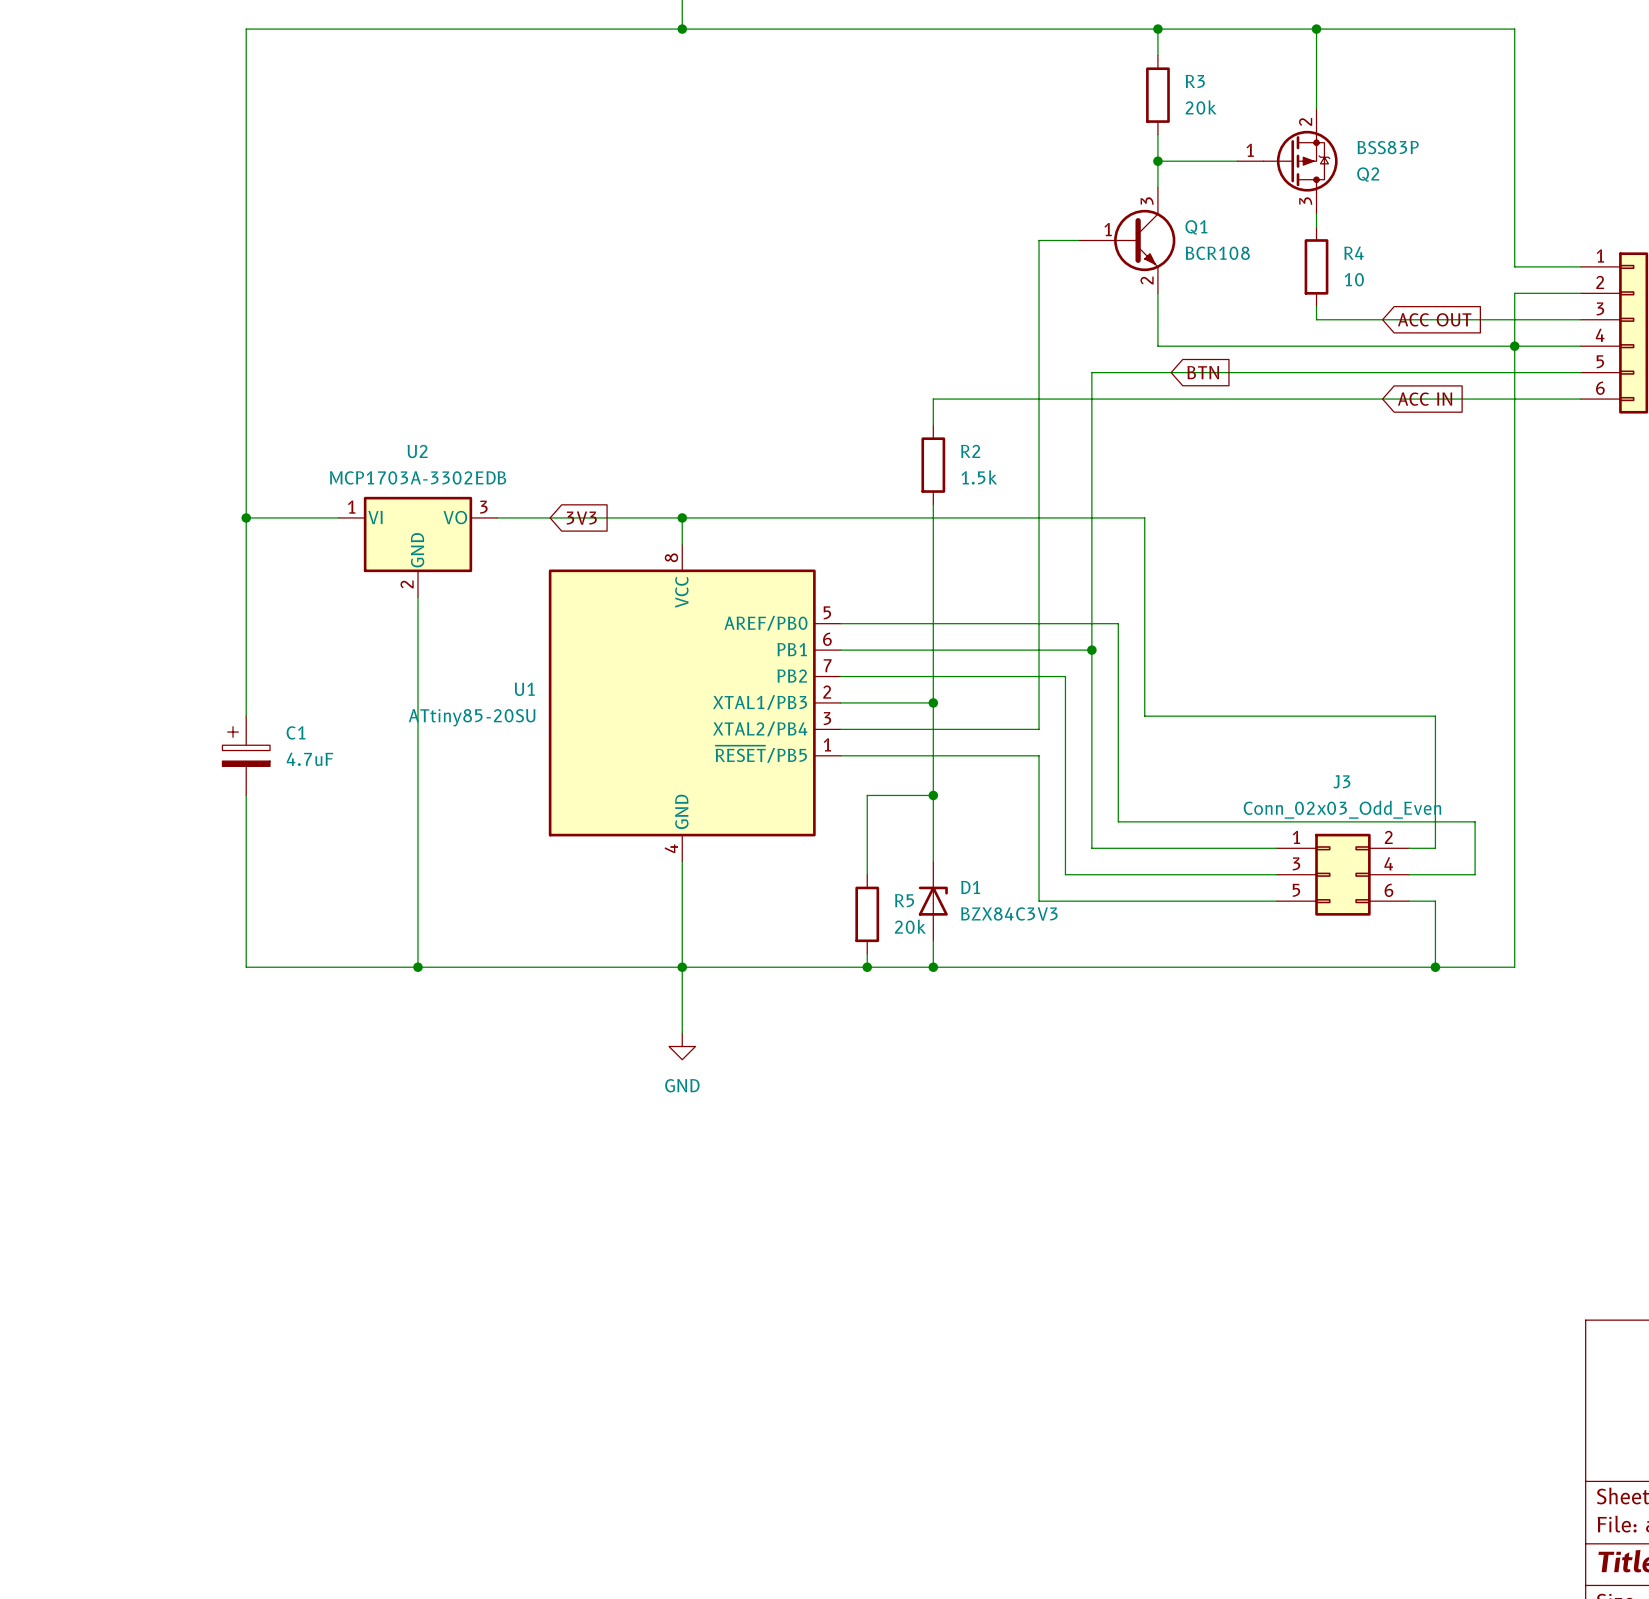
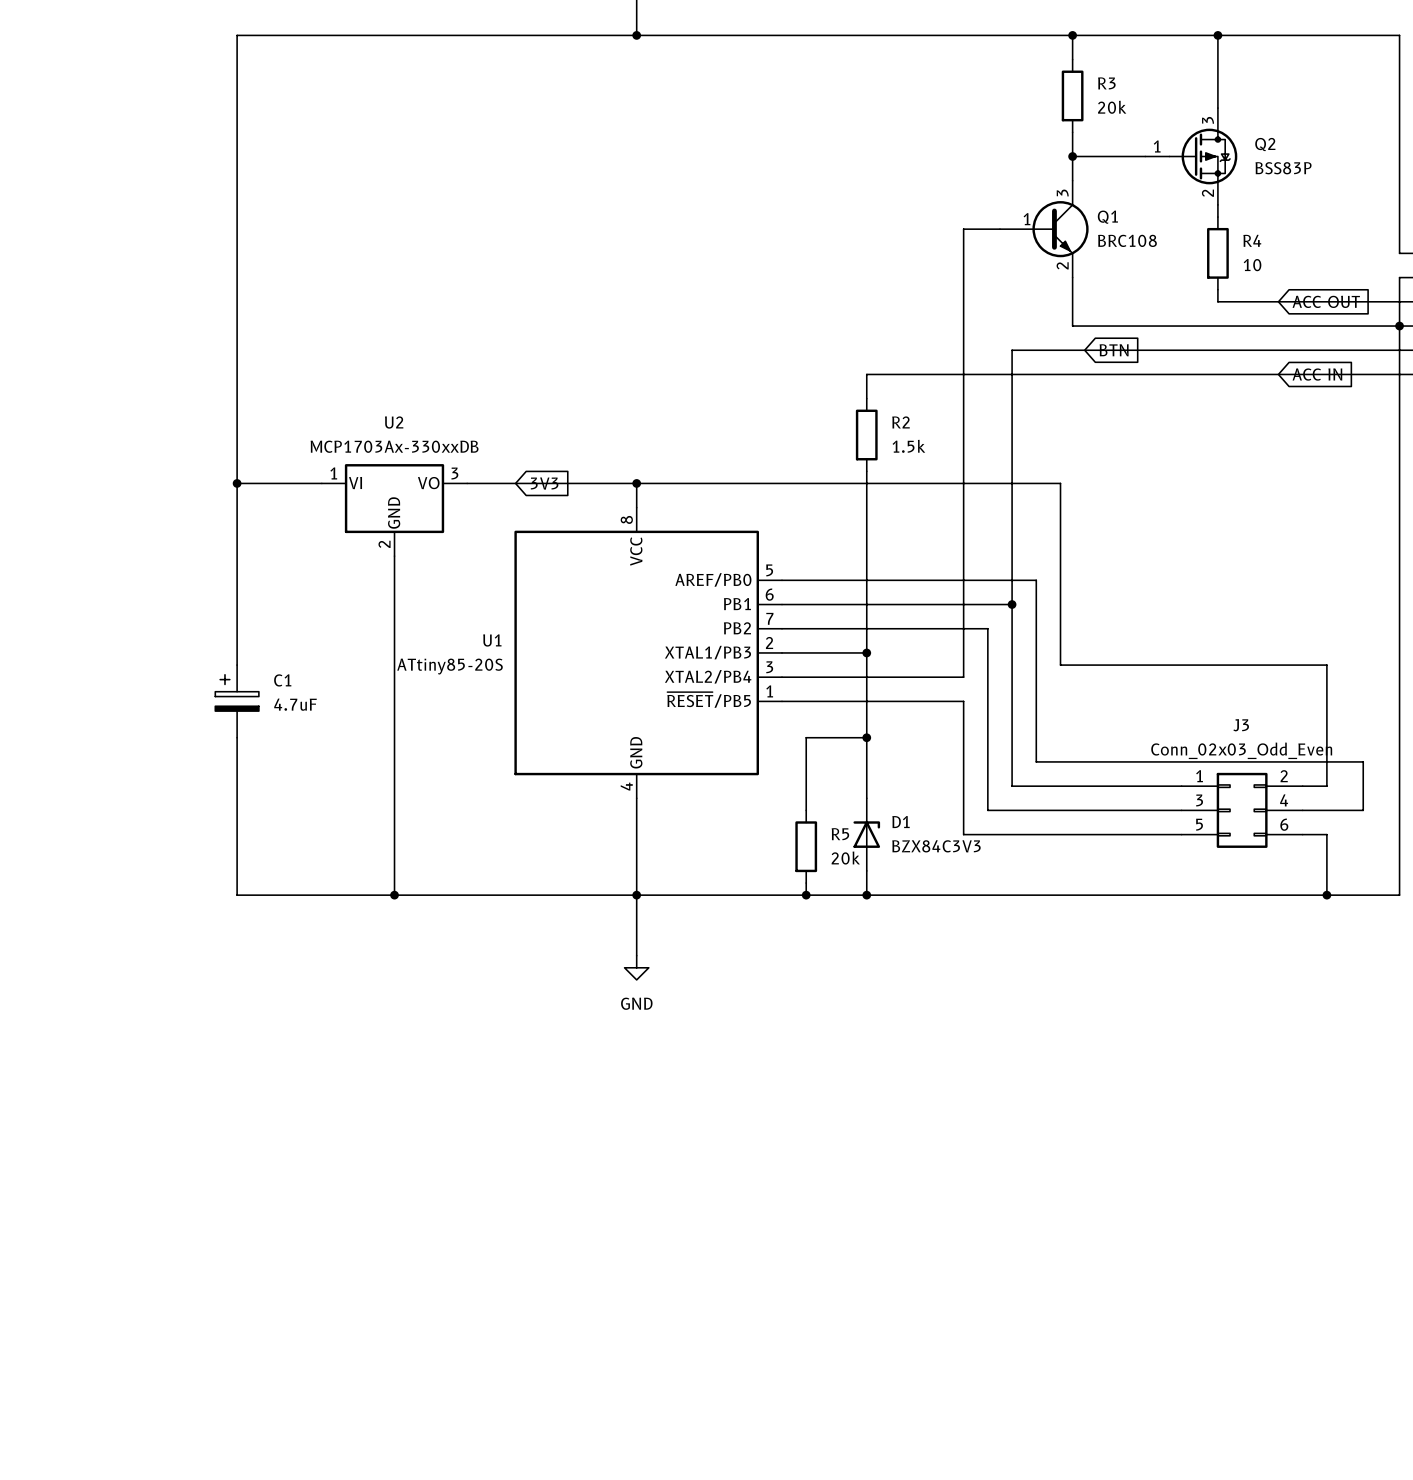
Q2 flip: as is (1300, 161) -> up-down (1203, 156)
Q1 value: BCR108 (1217, 253) -> BRC108 (1127, 240)
U2 value: MCP1703A-3302EDB (418, 477) -> MCP1703Ax-330xxDB (394, 446)
U1 value: ATtiny85-20SU (472, 717) -> ATtiny85-20S (450, 666)

